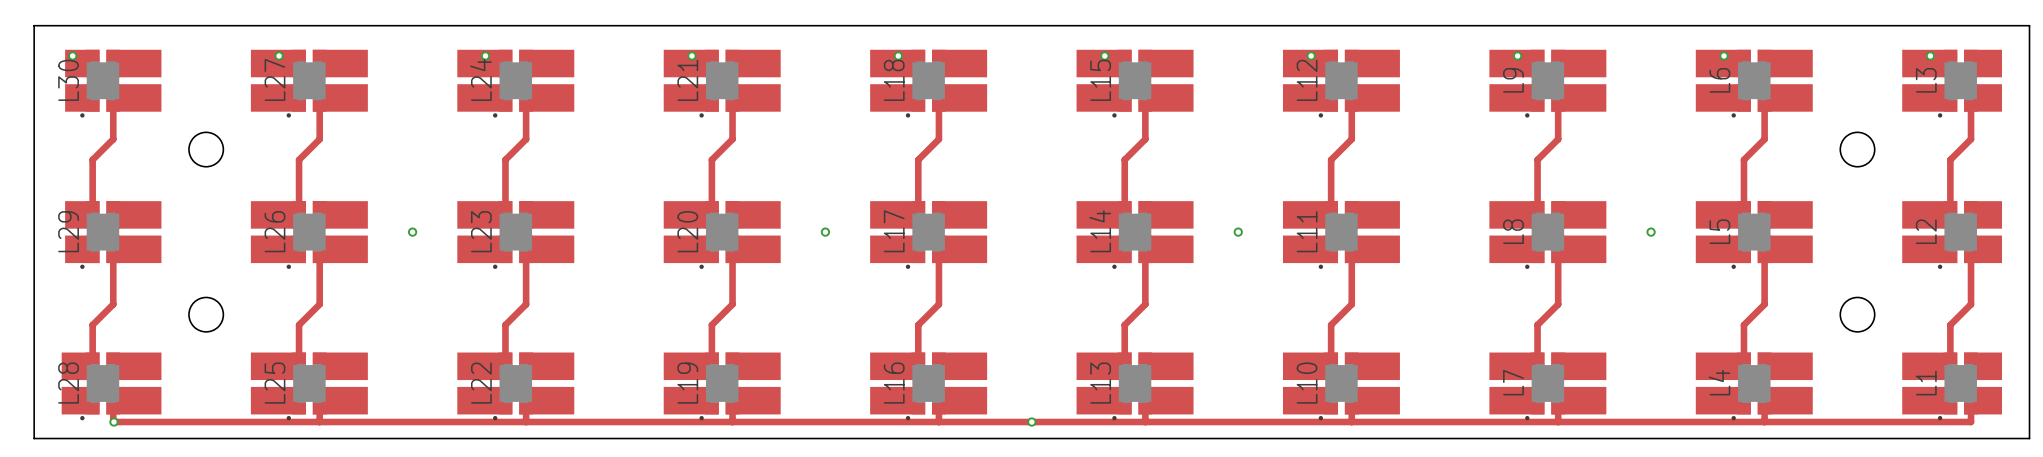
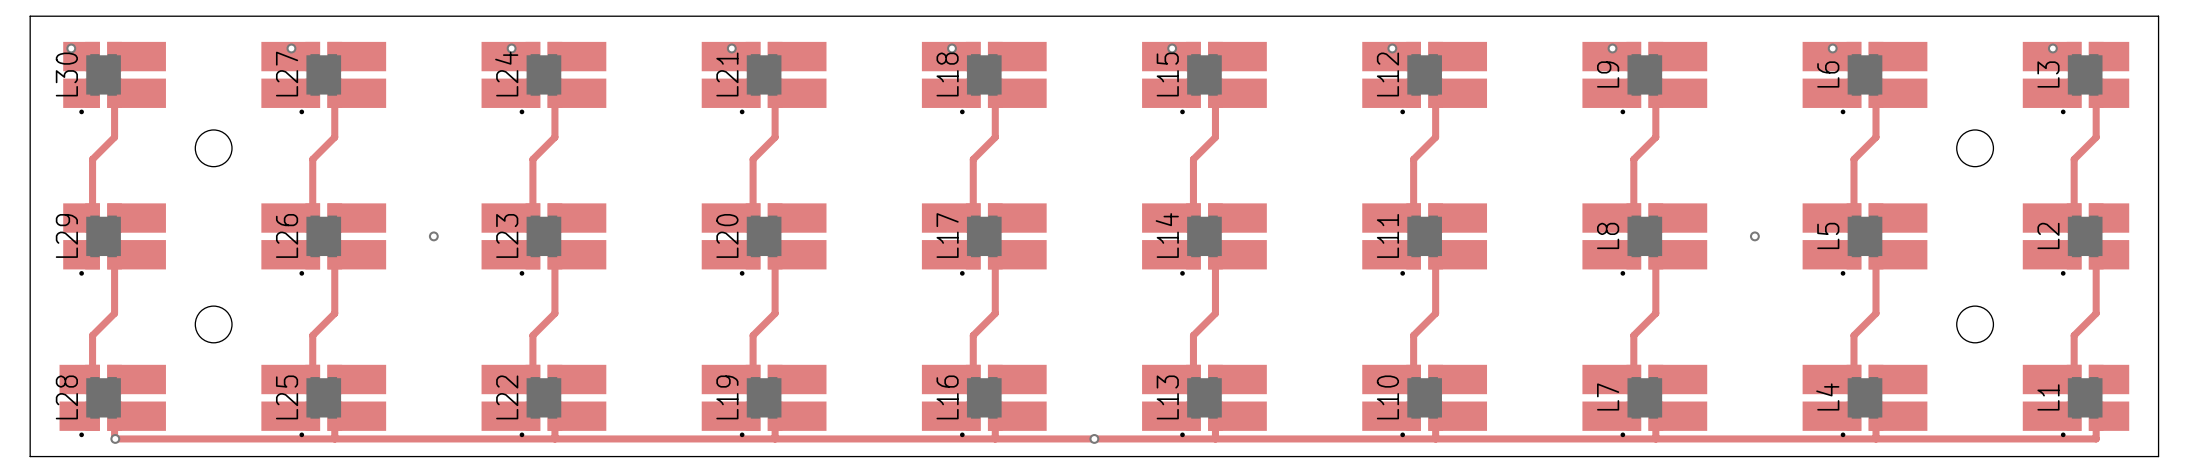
via: (825, 232) -> none
via: (1238, 232) -> none

